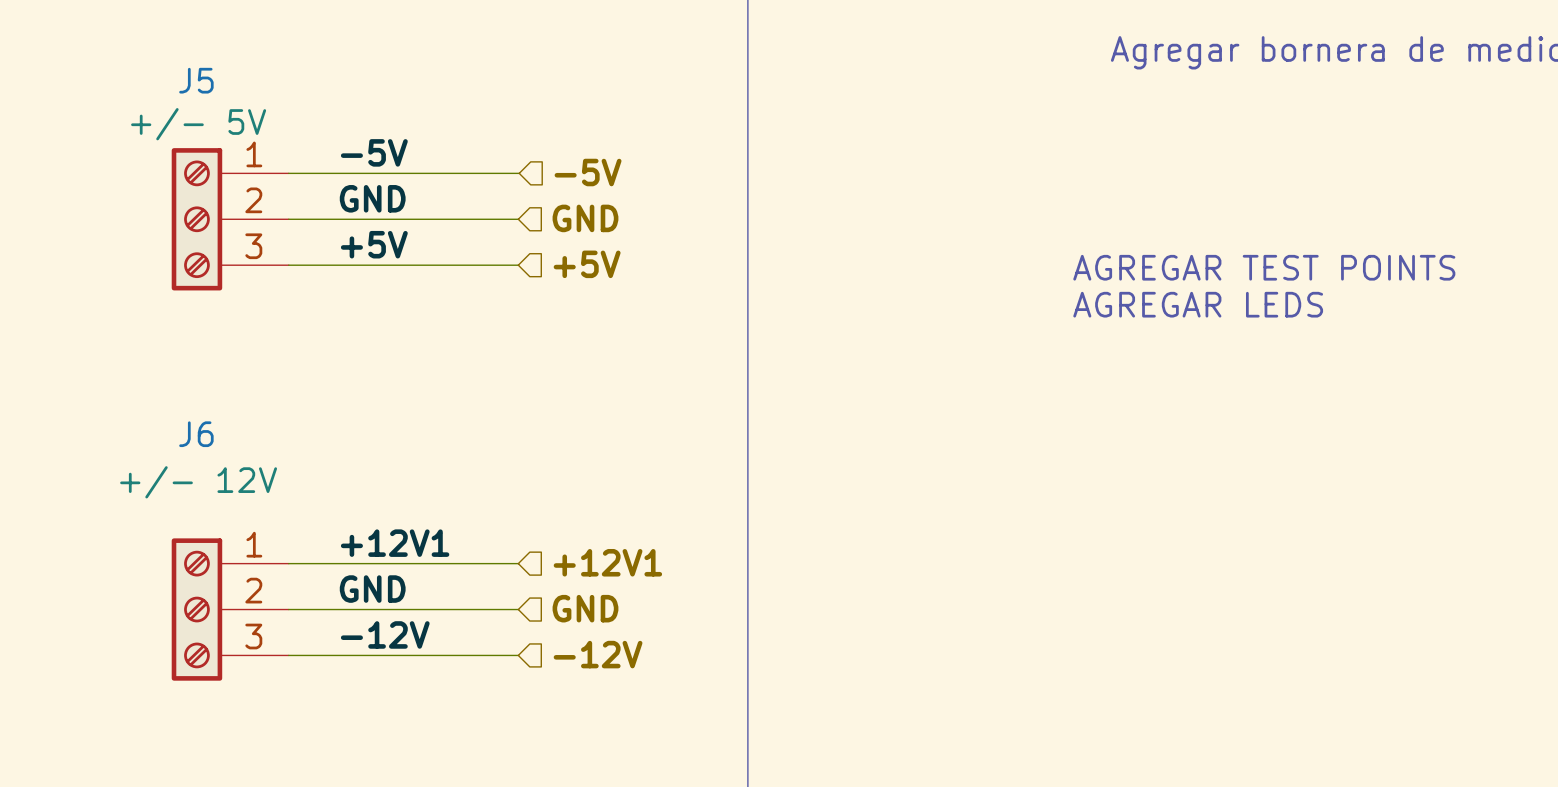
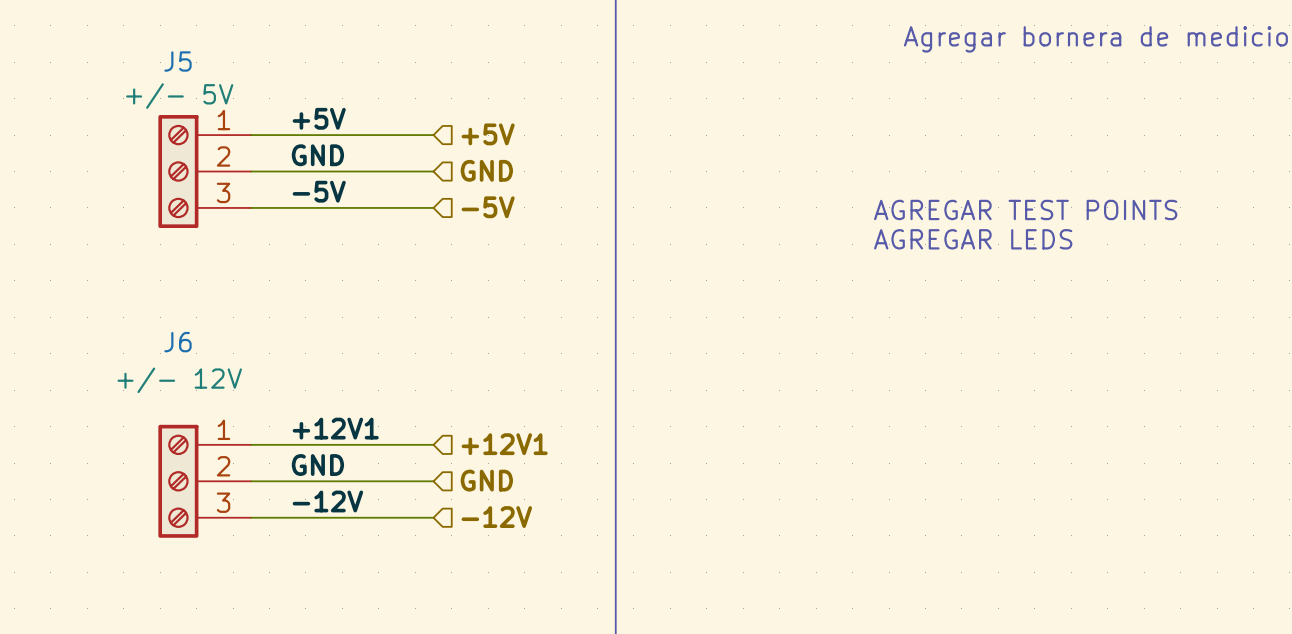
label: -5V (374, 152) -> +5V (319, 118)
hierarchical label: -5V (588, 172) -> +5V (488, 134)
label: +5V (374, 244) -> -5V (319, 191)
hierarchical label: +5V (587, 264) -> -5V (488, 207)

